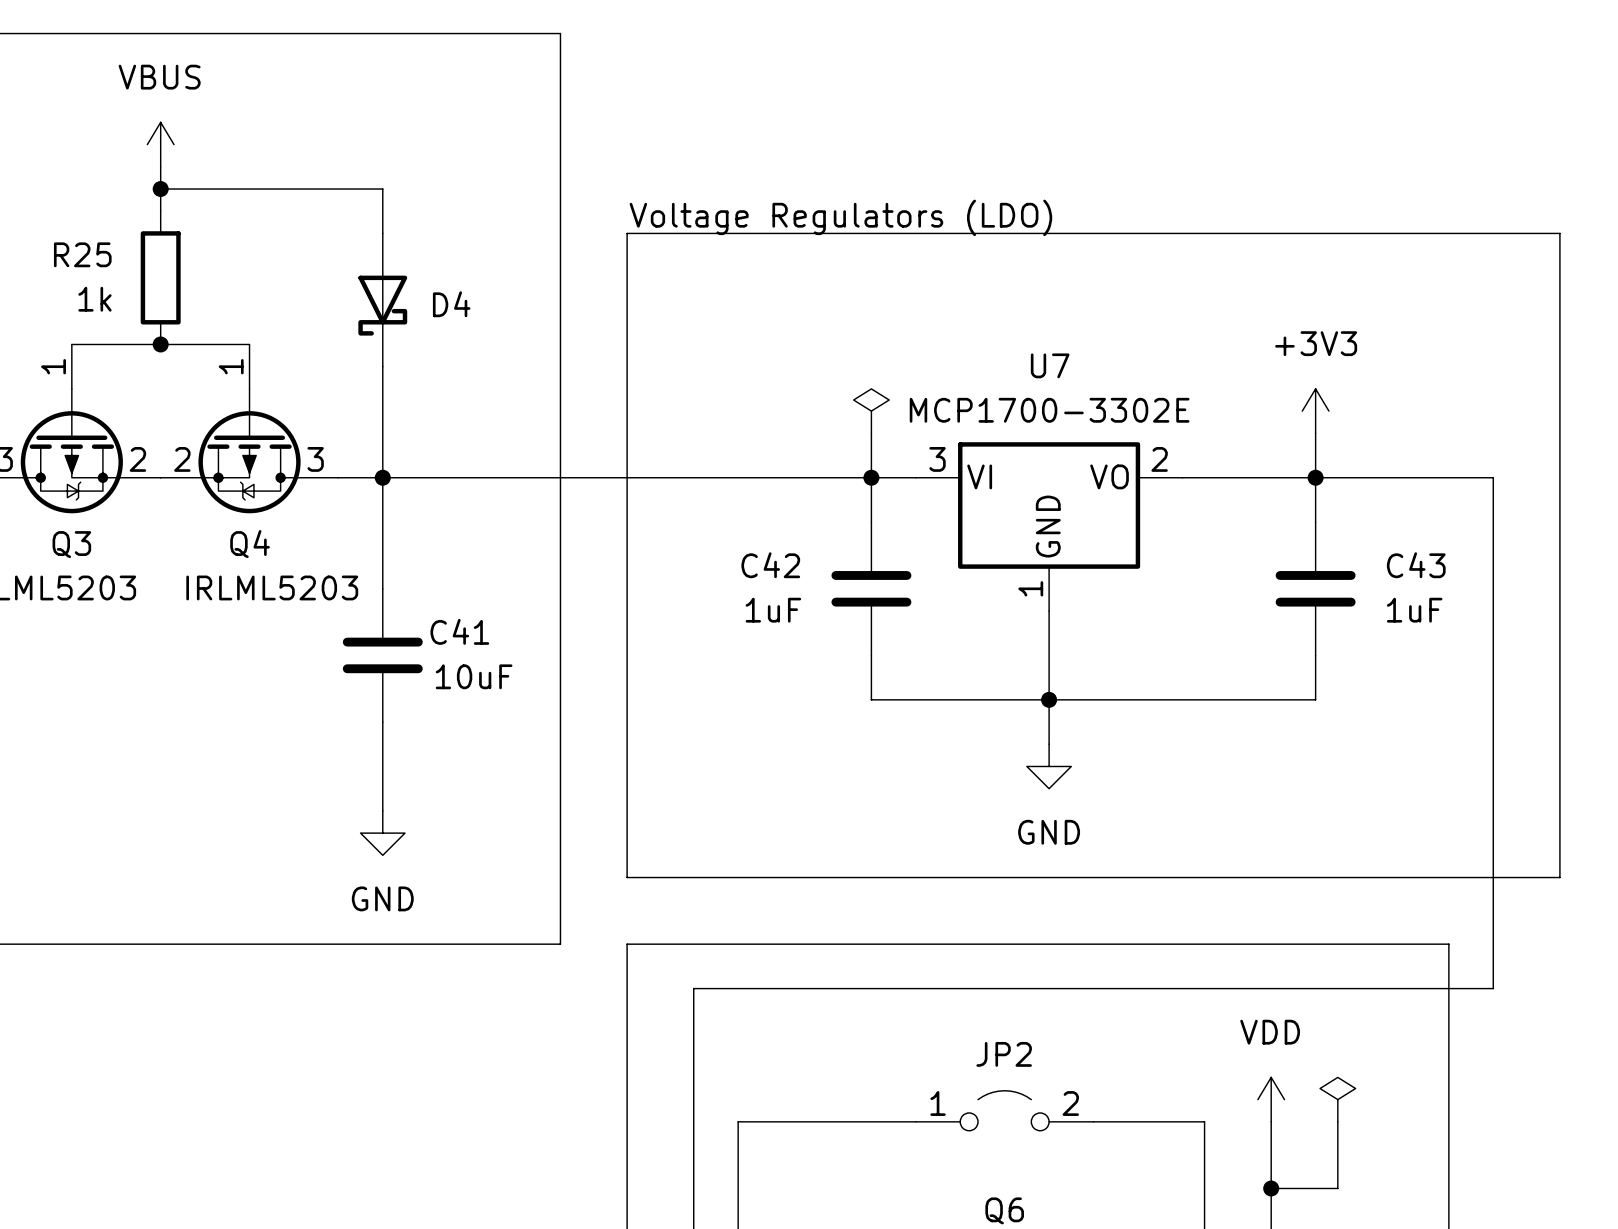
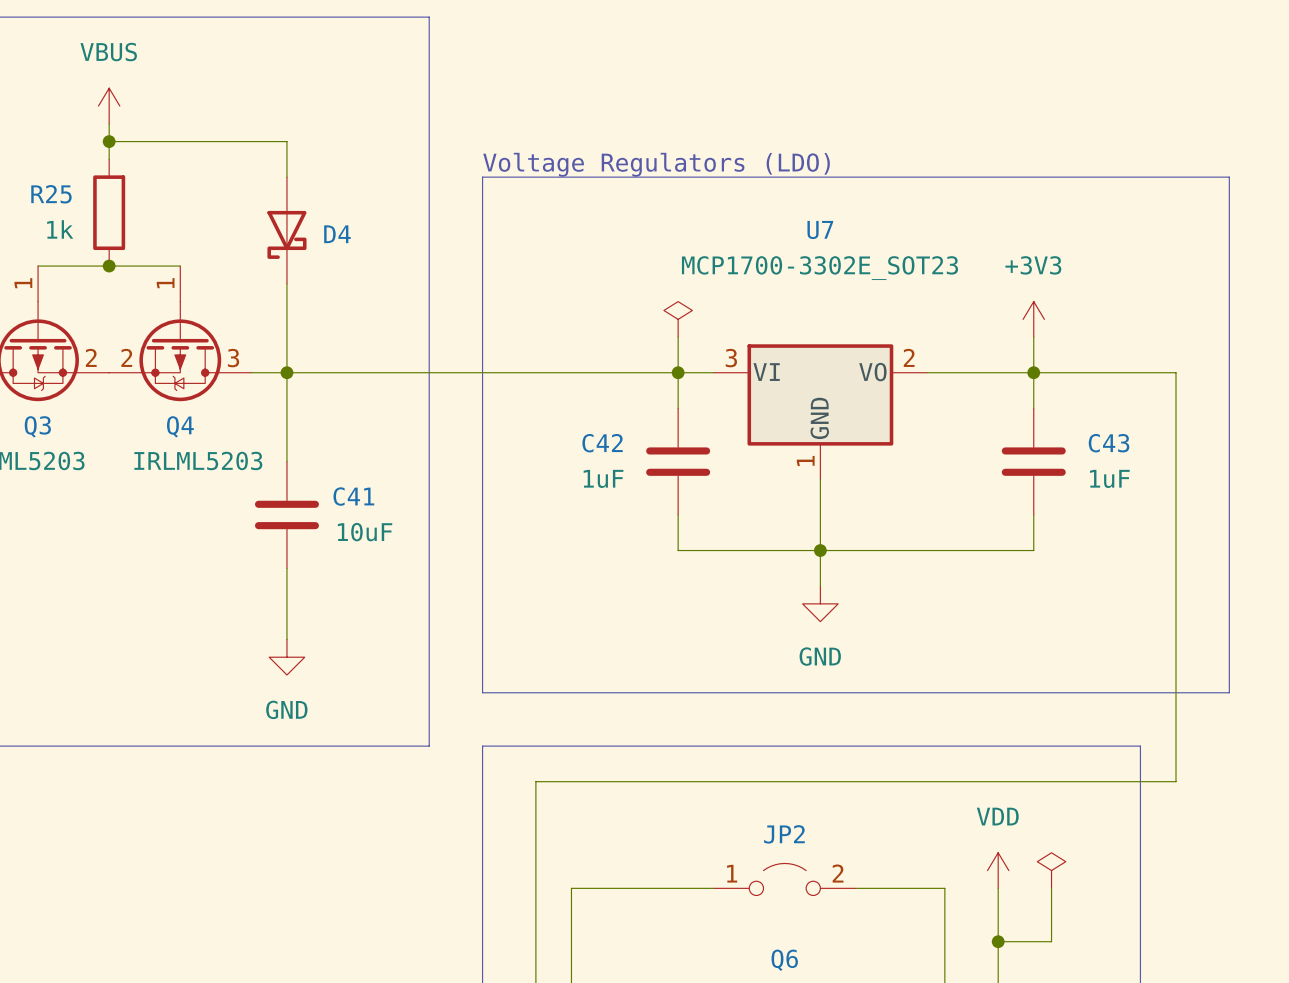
U7 name position: U7 (1050, 365) -> U7 (820, 229)
U7 value: MCP1700-3302E (1049, 410) -> MCP1700-3302E_SOT23 (819, 268)

